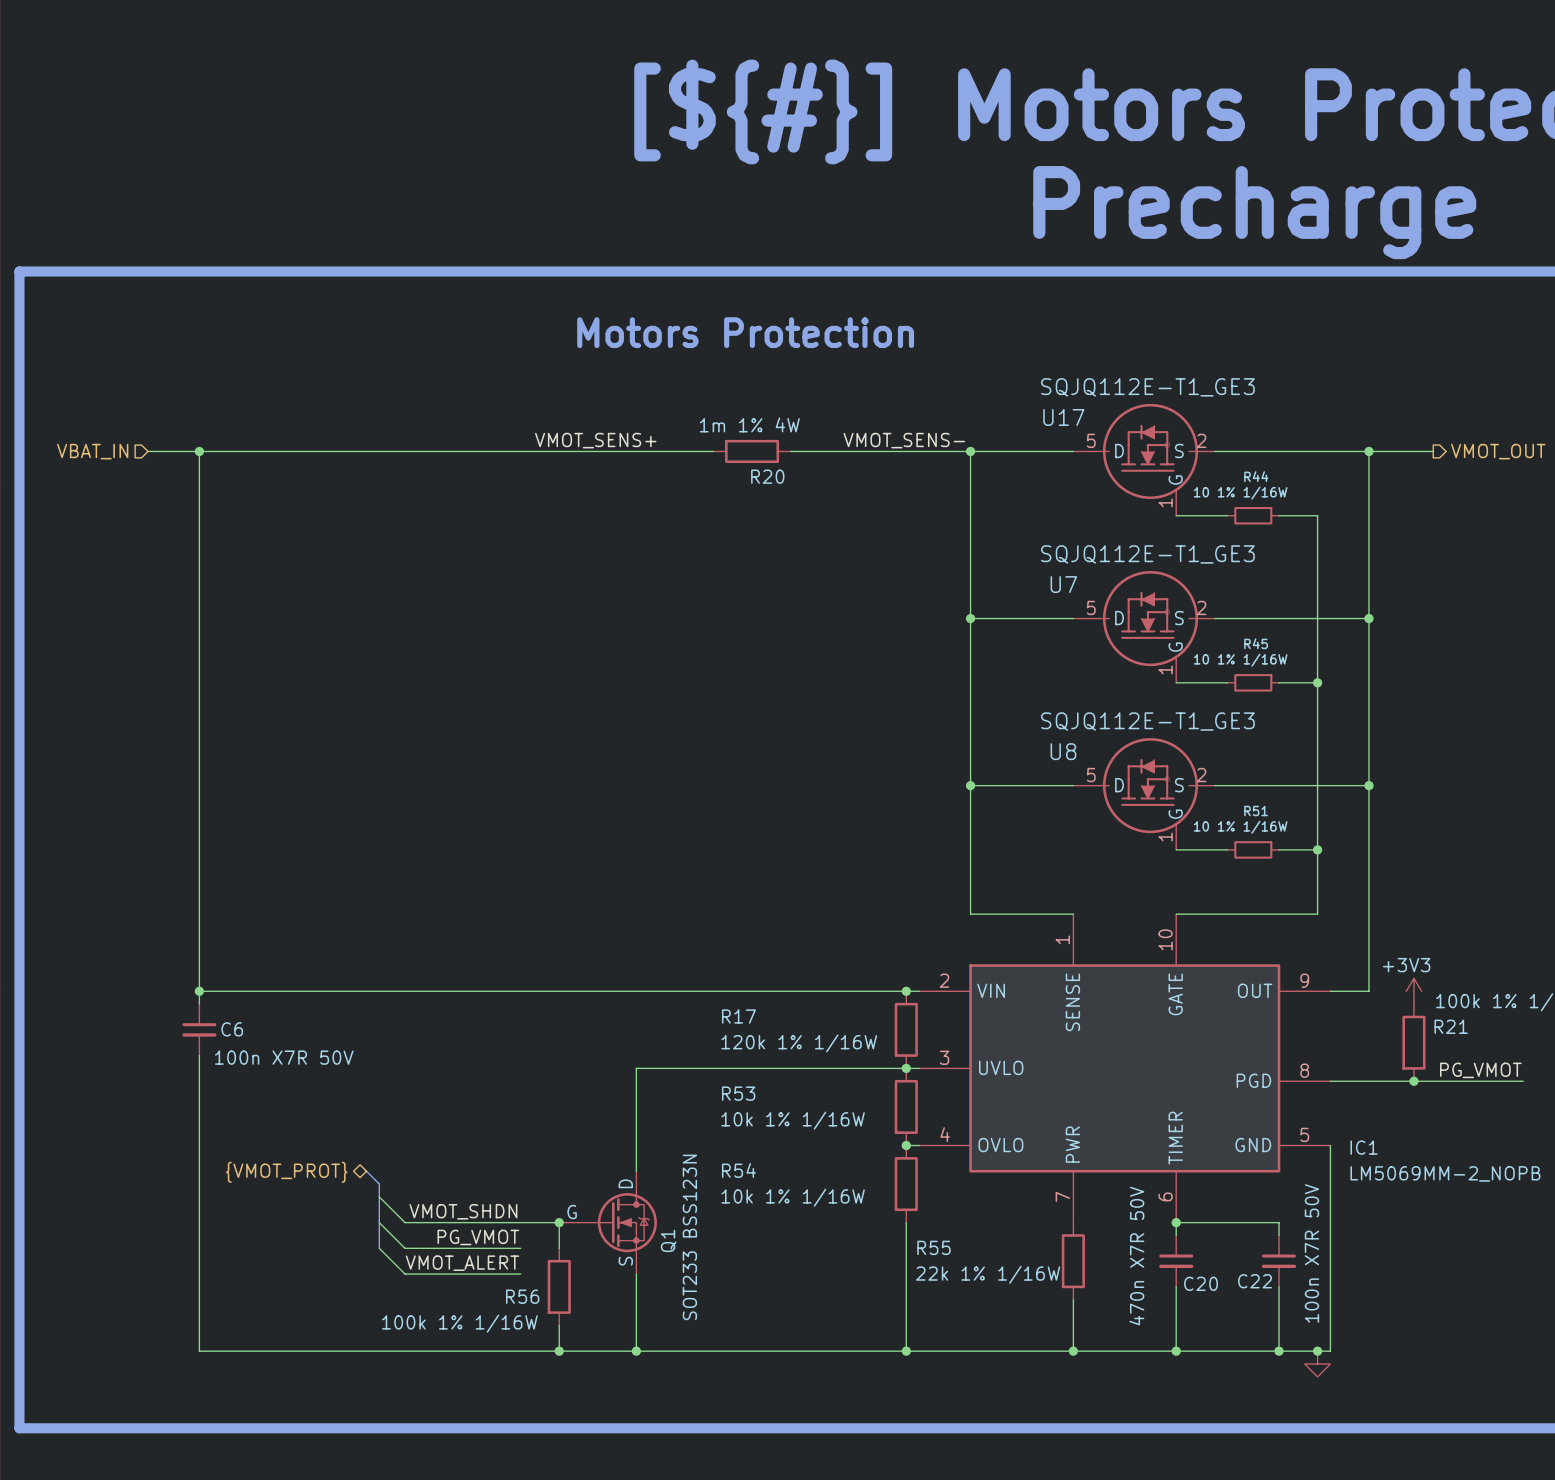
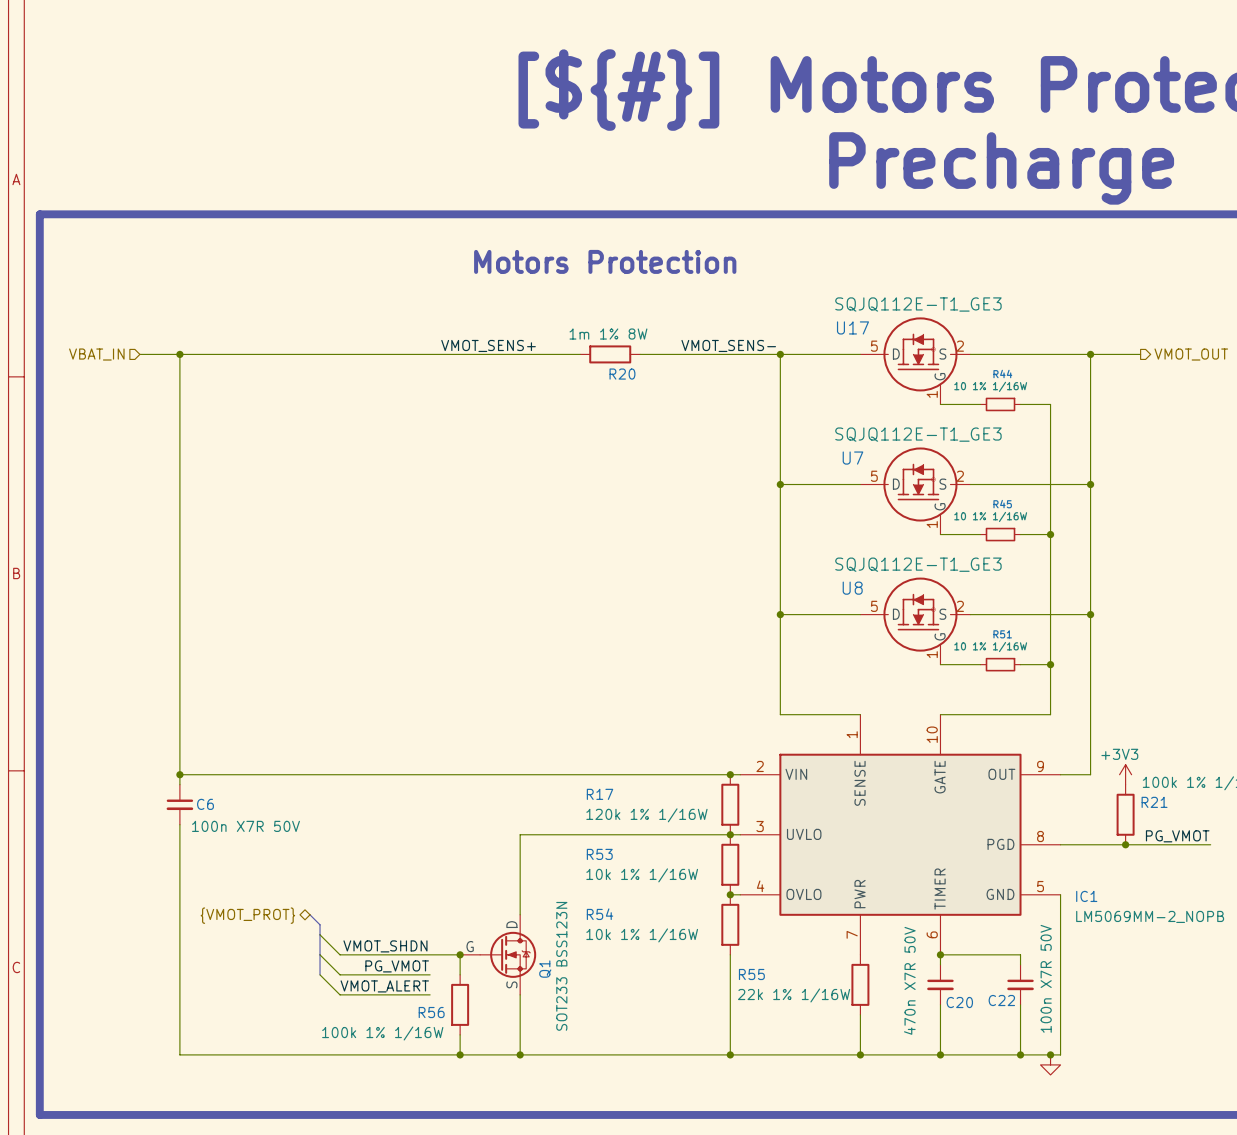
R20 value: 1m 1% 4W (749, 424) -> 1m 1% 8W (608, 334)

